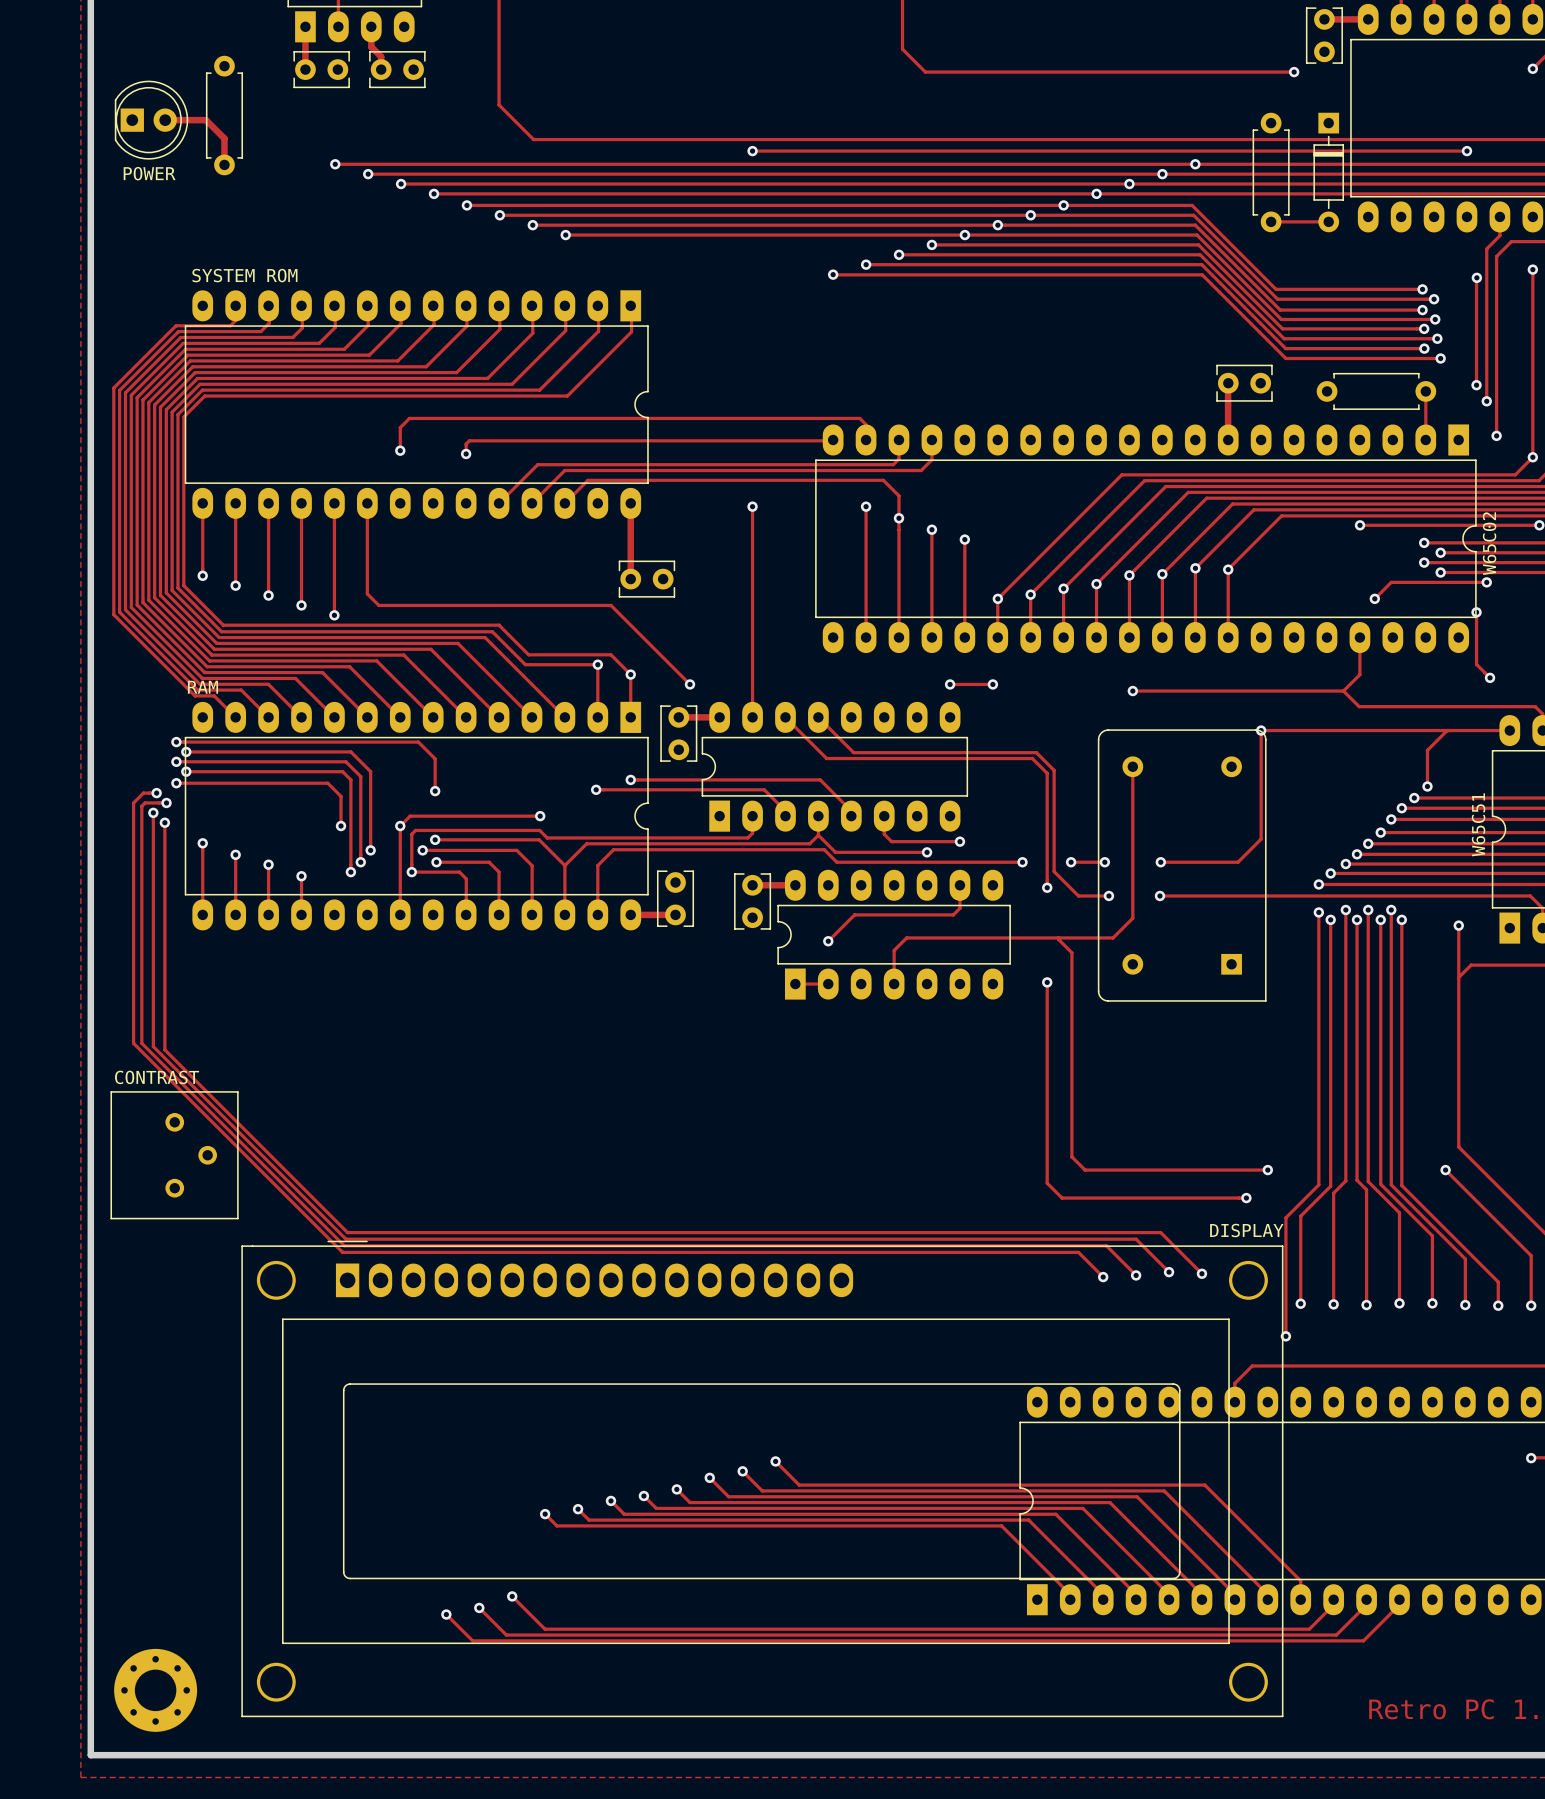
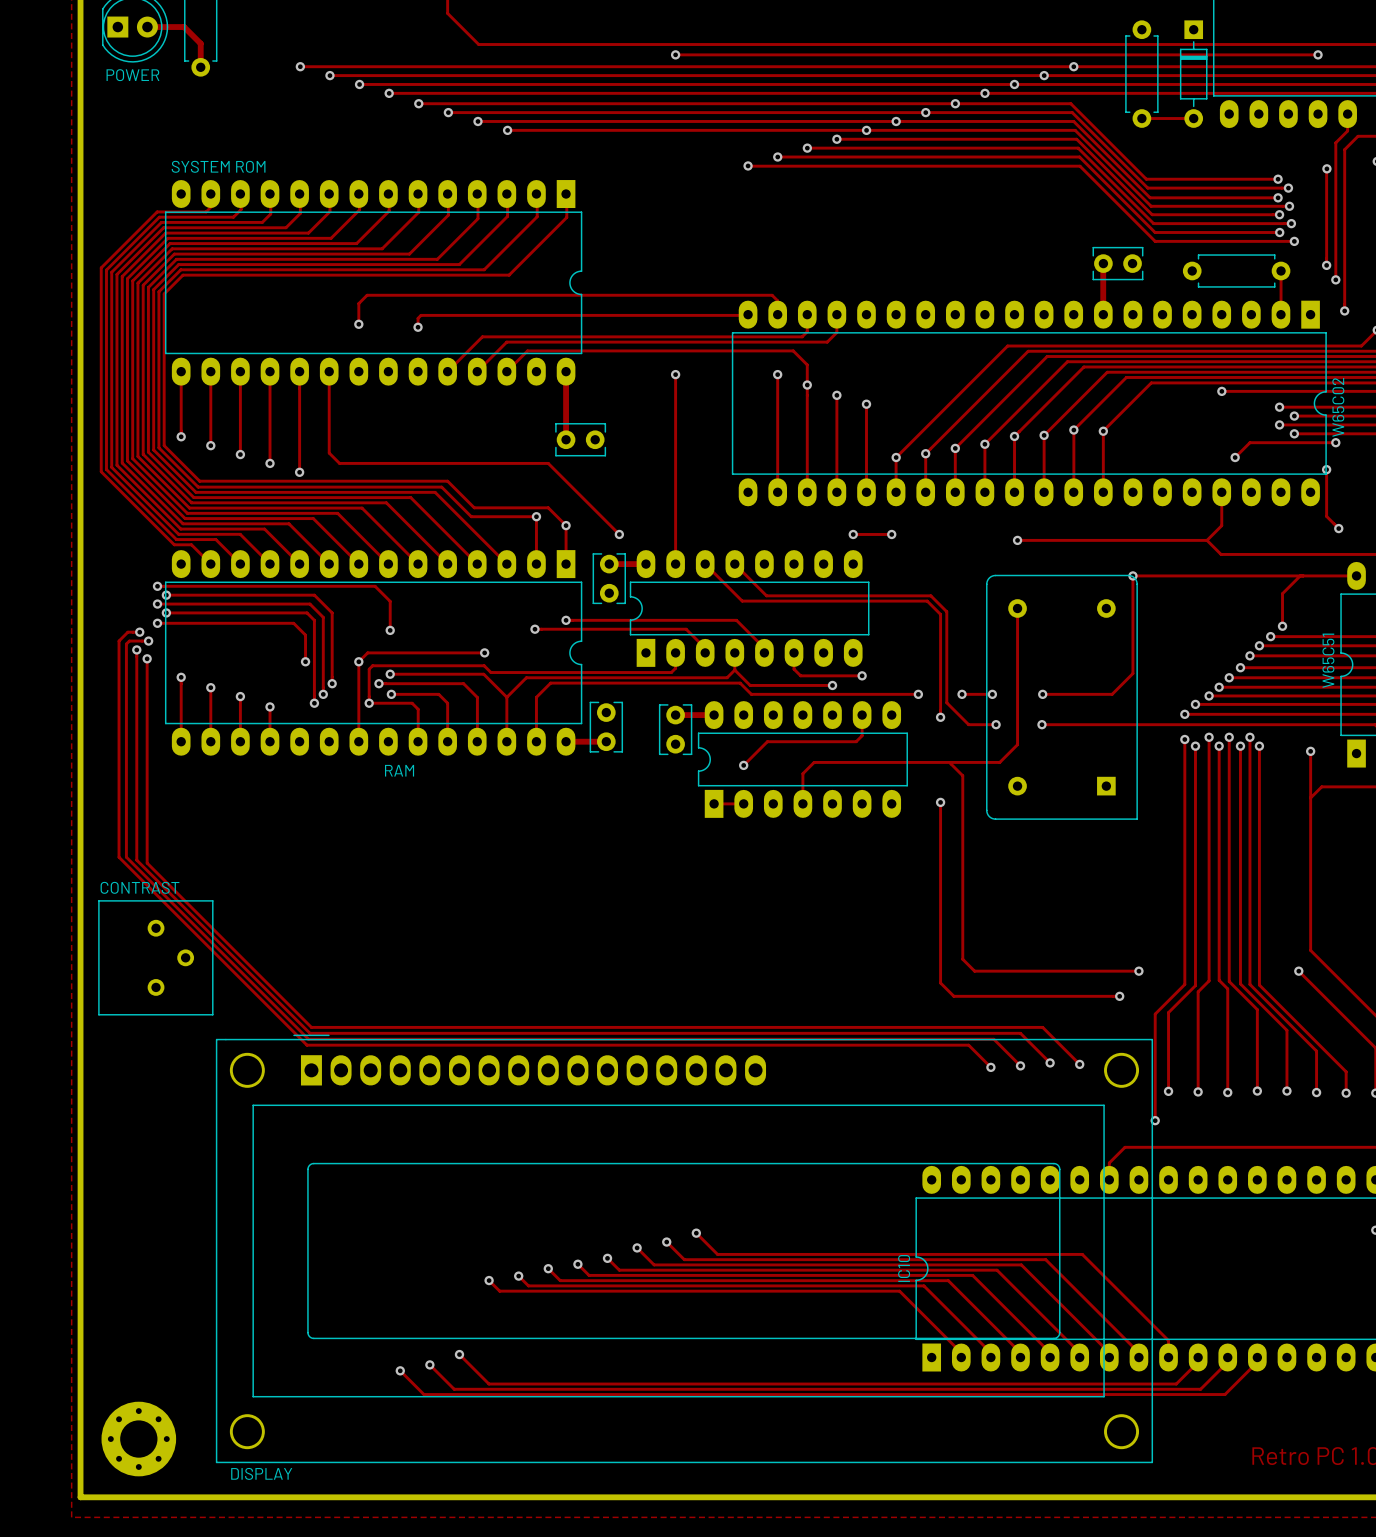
part value position: RAM (202, 687) -> RAM (399, 770)
part value position: DISPLAY (1246, 1230) -> DISPLAY (261, 1473)
IC10 name: none -> IC10 (904, 1268)

